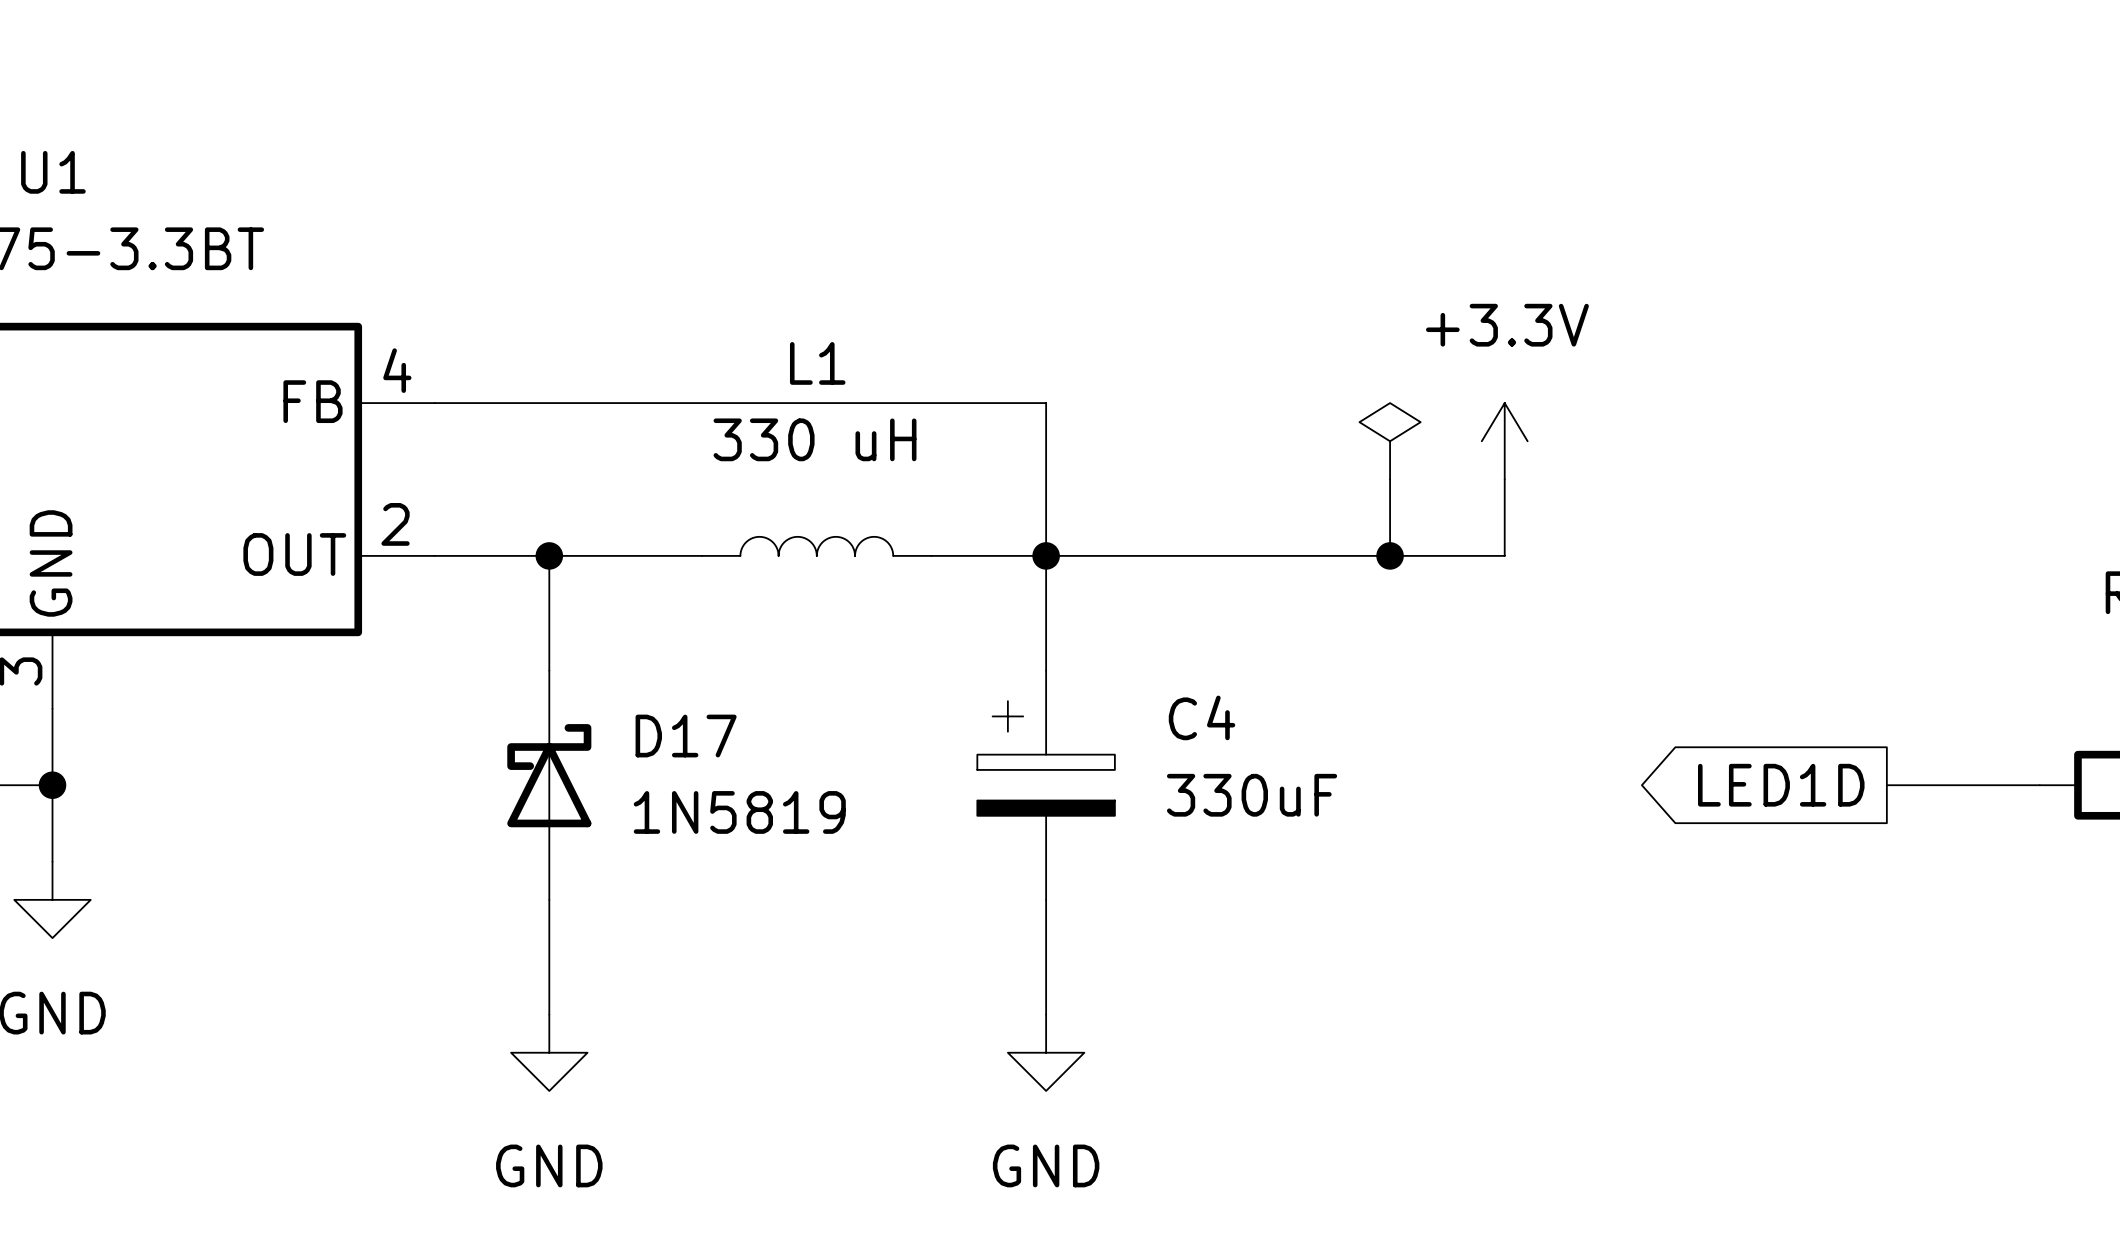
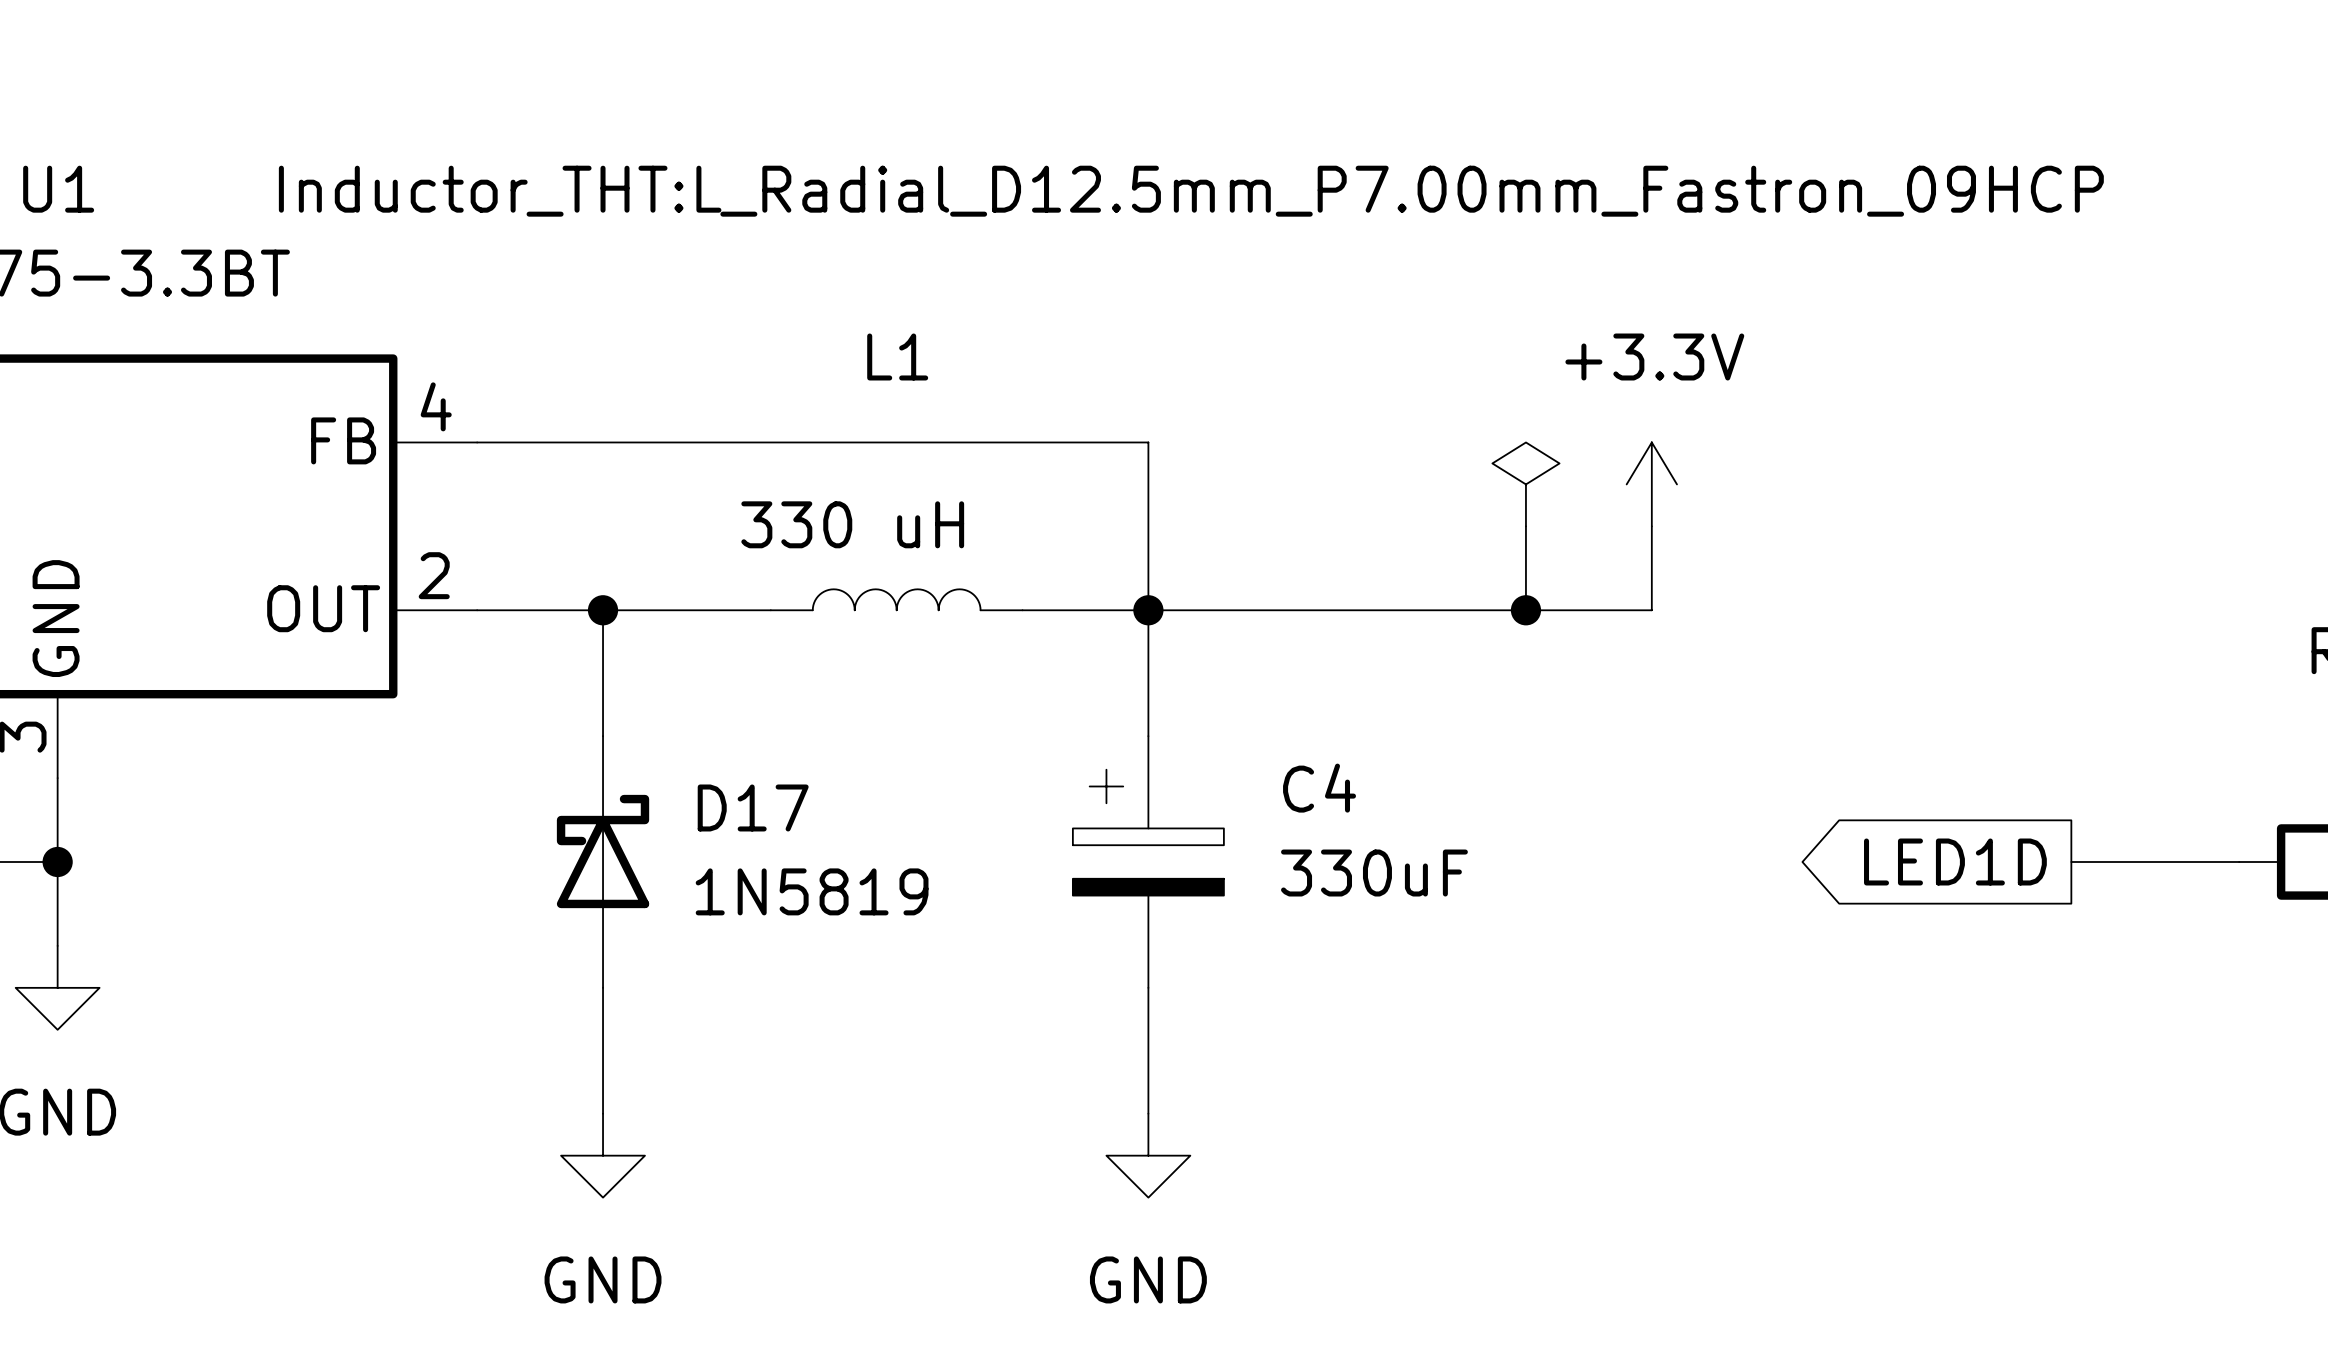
L1 text: none -> Inductor_THT:L_Radial_D12.5mm_P7.00mm_Fastron_09HCP (1191, 191)
L1 name position: L1 (817, 363) -> L1 (897, 357)
L1 value position: 330 uH (815, 439) -> 330 uH (852, 524)

